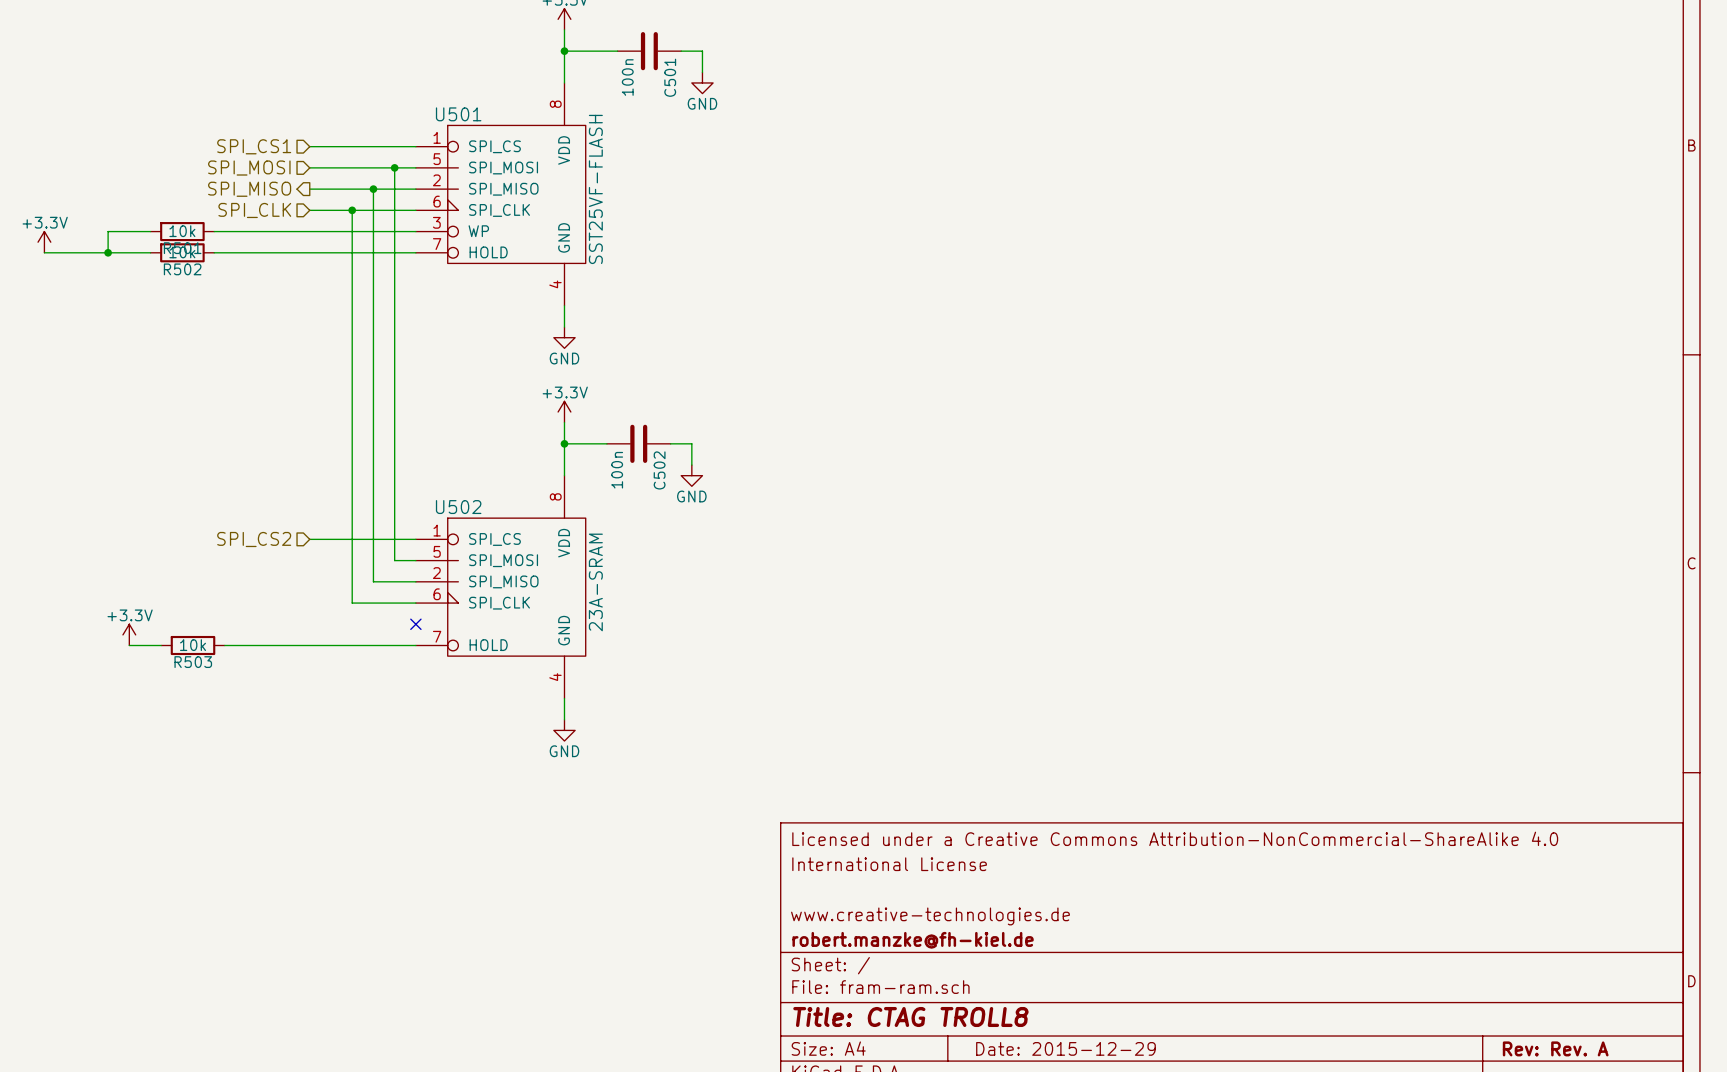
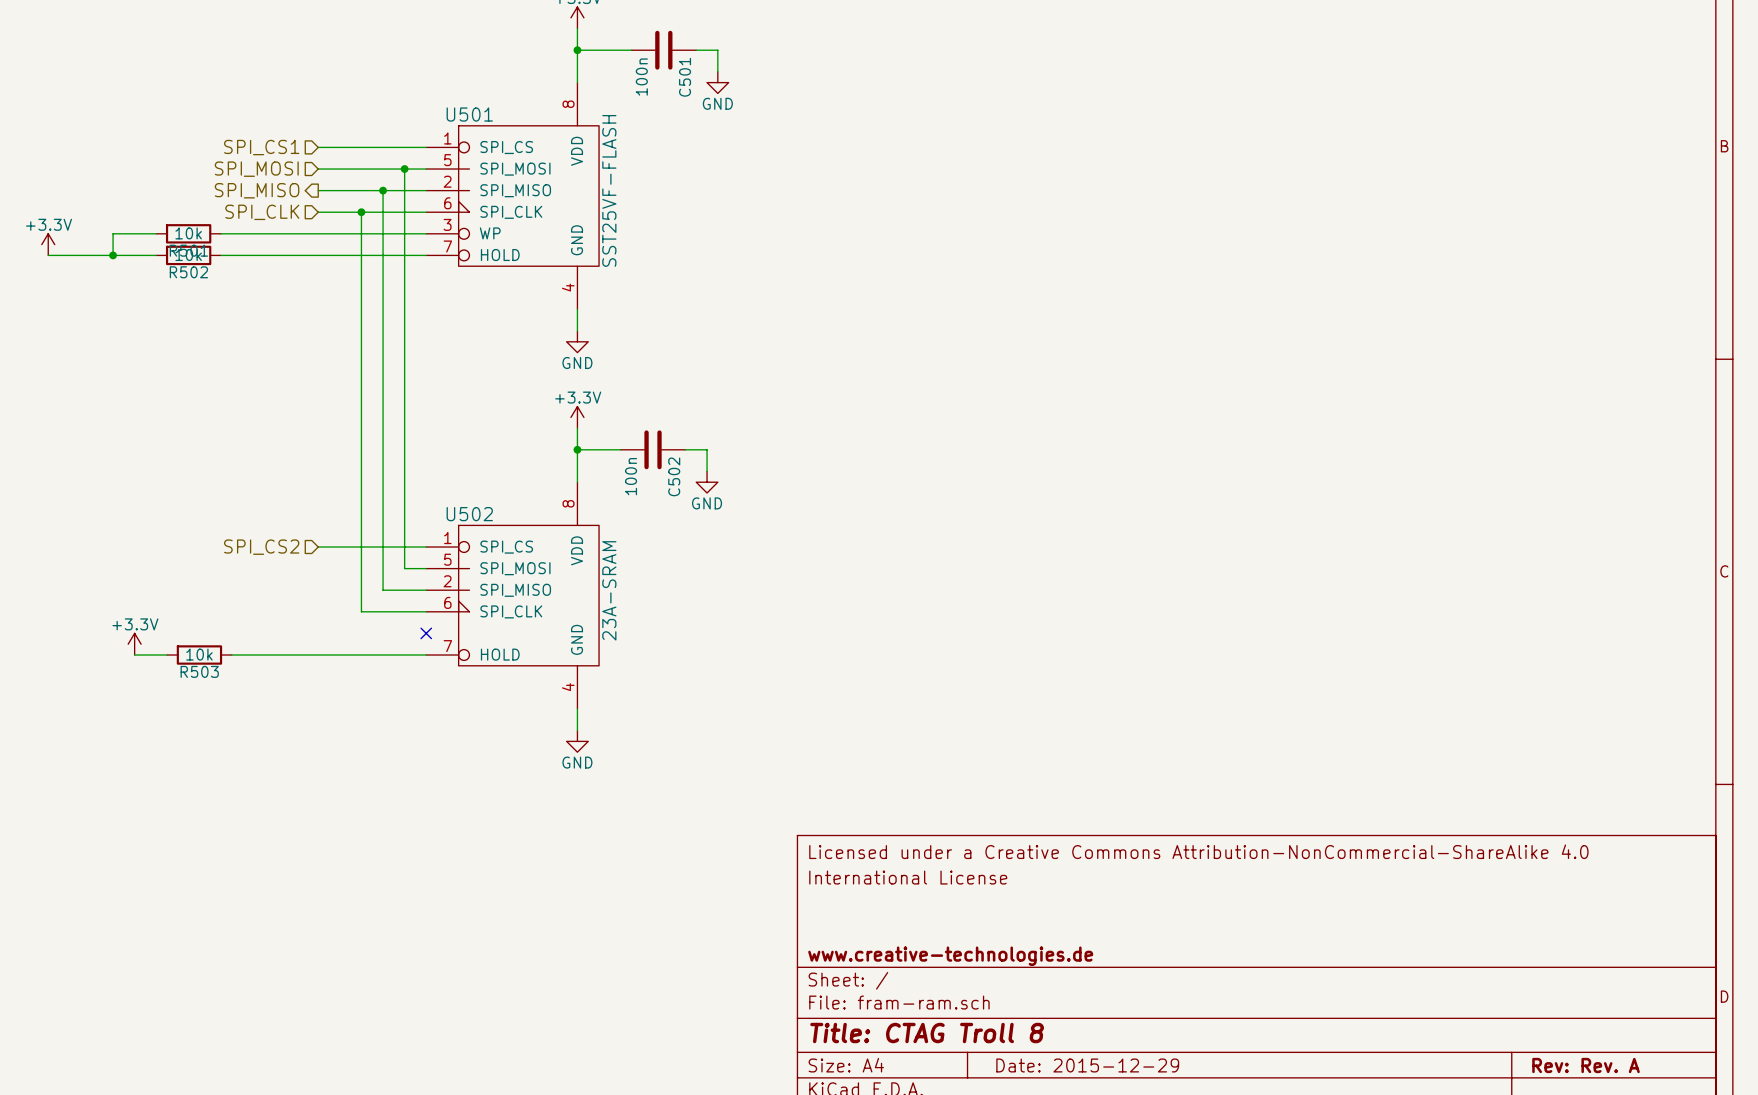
title block: www.creative-technologies.de (930, 916) -> none
title block: robert.manzke@fh-kiel.de (913, 940) -> www.creative-technologies.de (950, 956)
title block: Title: CTAG TROLL8 (910, 1016) -> Title: CTAG Troll 8 (927, 1033)

